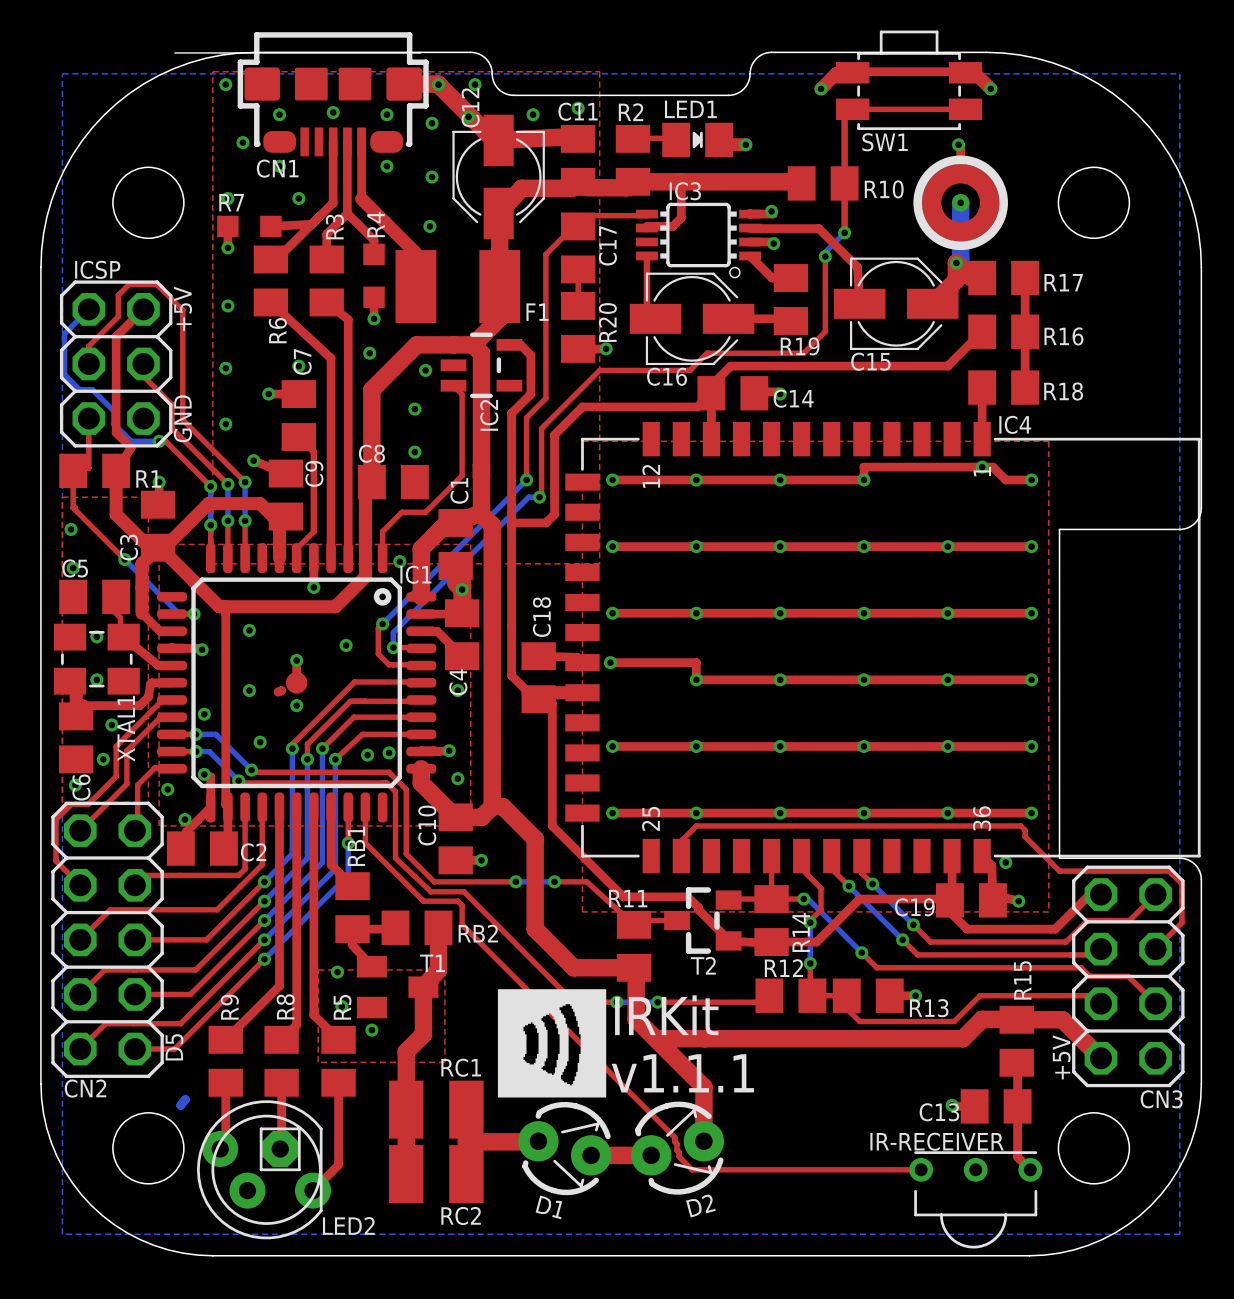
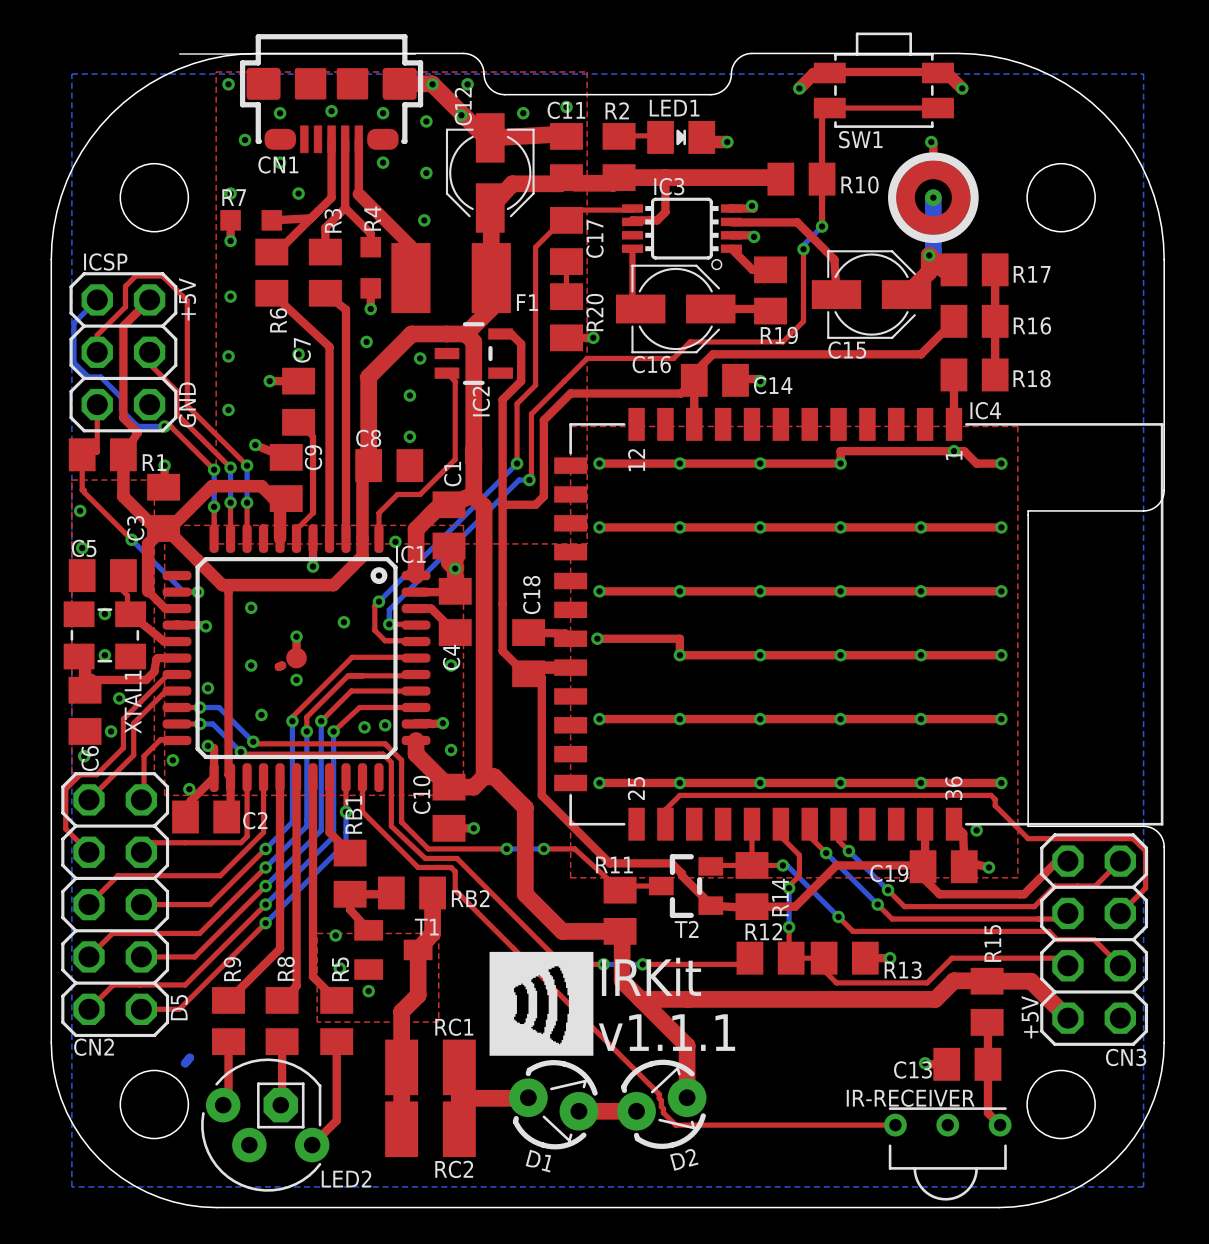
LED2 footprint: [196, 1100, 331, 1240] -> [201, 1058, 330, 1192]

